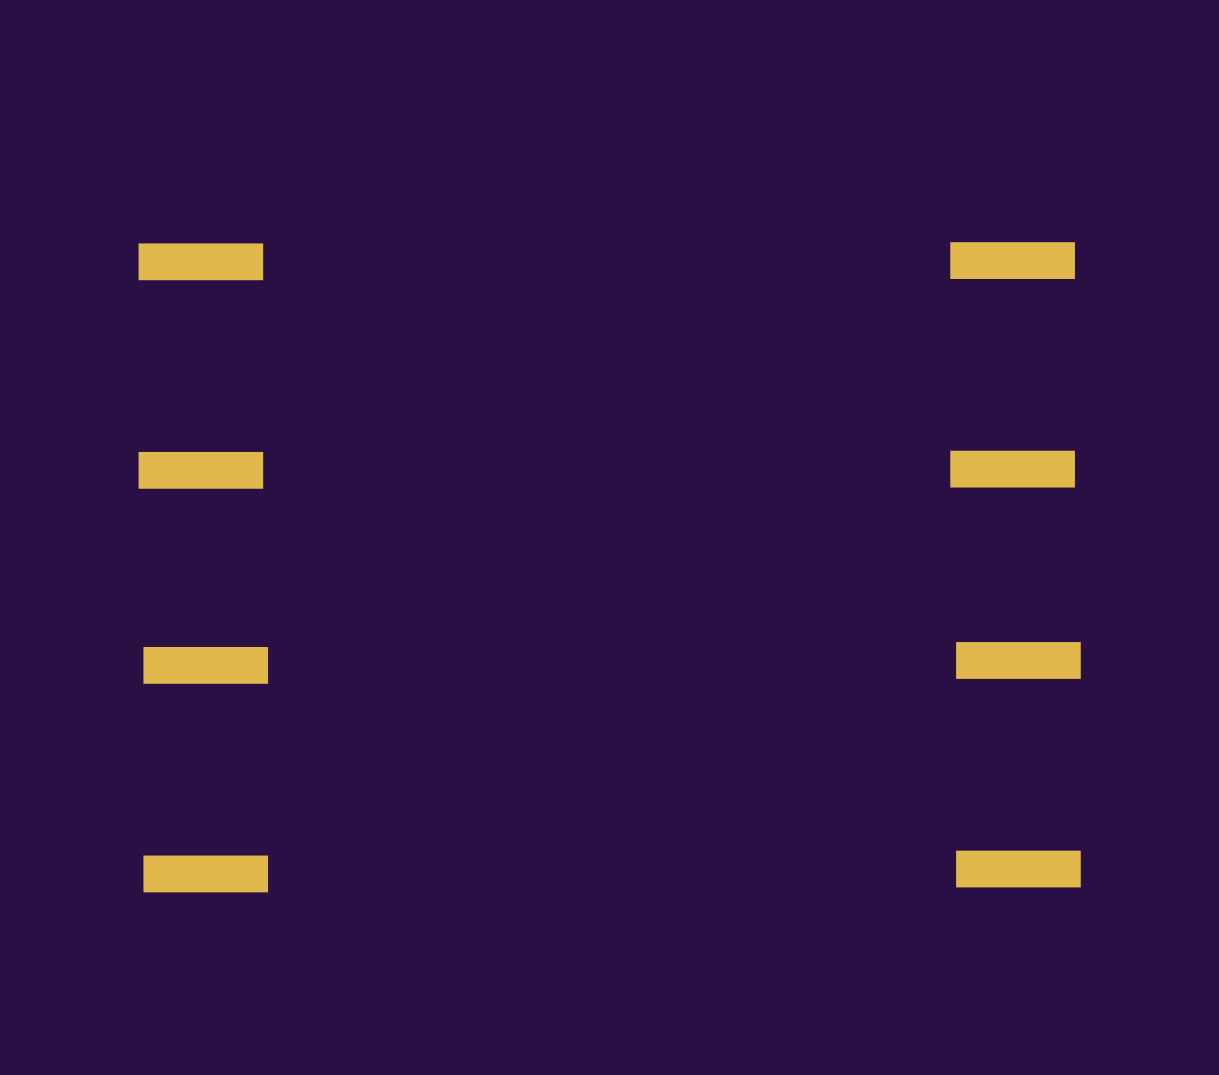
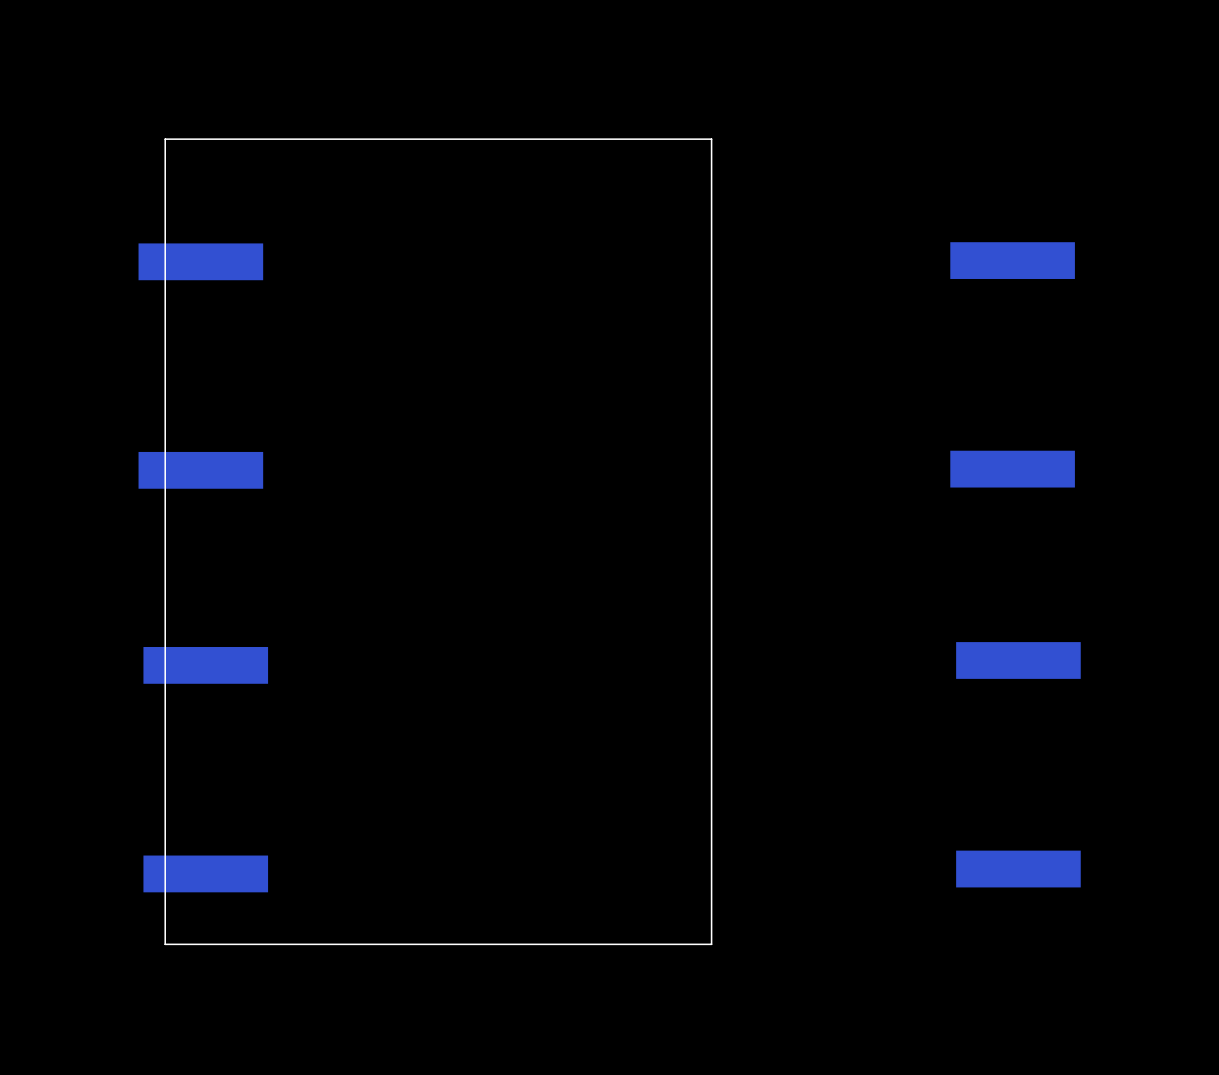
board edge: none -> (711, 139) (165, 139) (165, 944) (711, 944) (711, 139)

